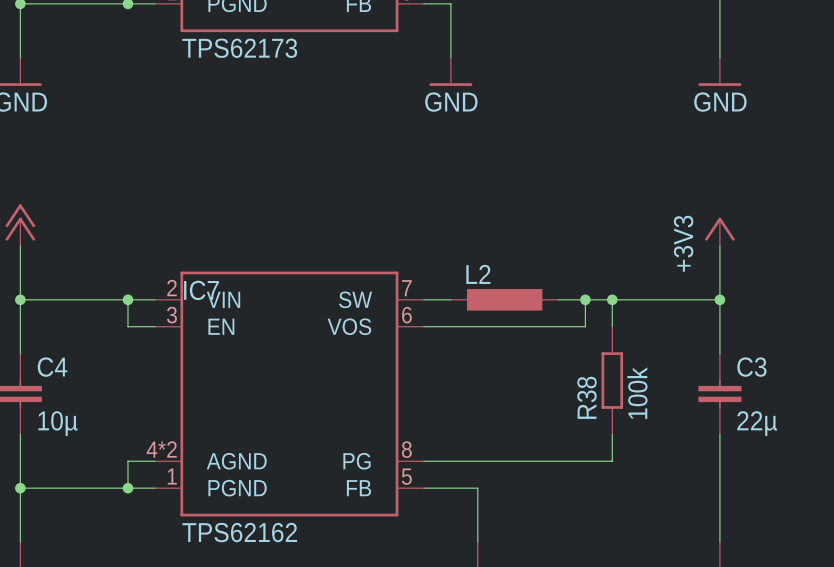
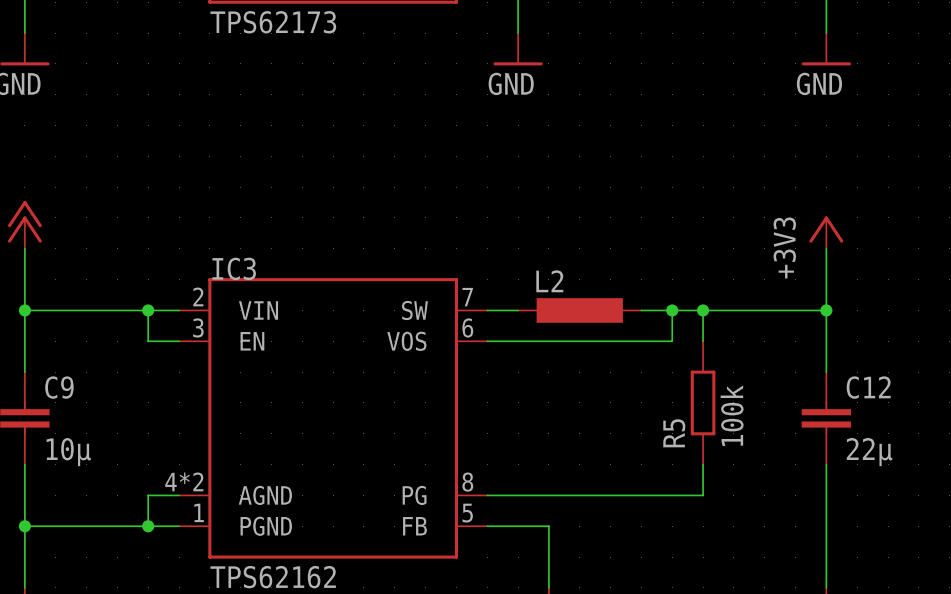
IC7 name: IC7 (201, 290) -> IC3 (234, 268)
C4 name: C4 (52, 367) -> C9 (59, 387)
C3 name: C3 (751, 367) -> C12 (868, 387)
R38 name: R38 (587, 397) -> R5 (674, 433)

